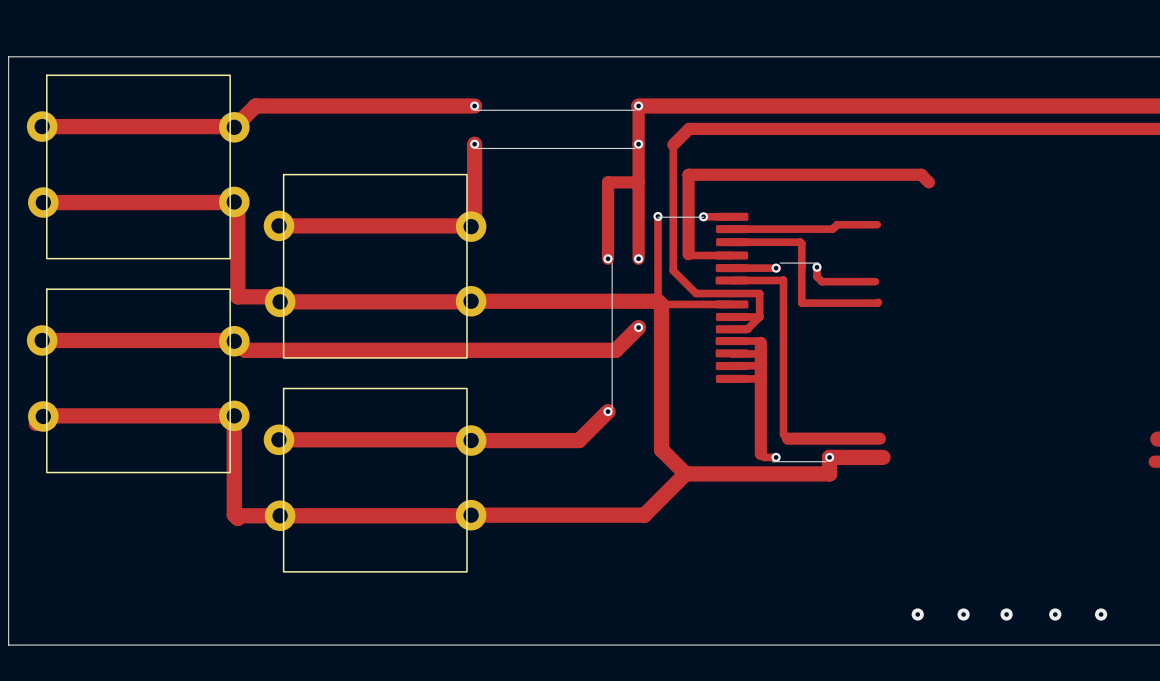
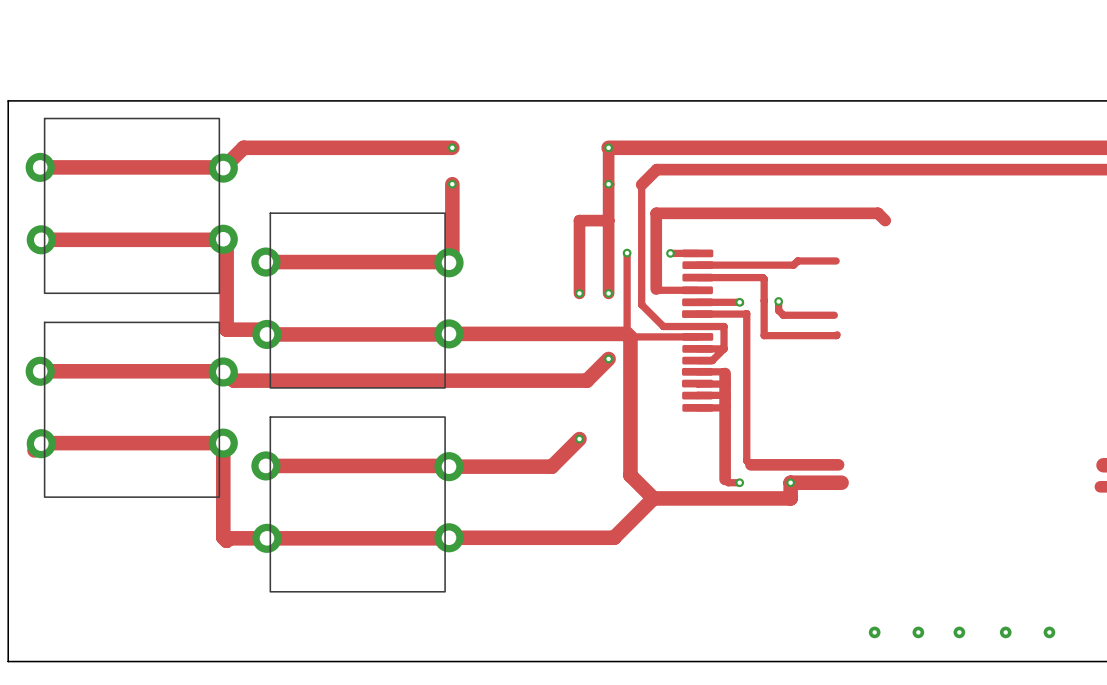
board edge: (474, 110) (635, 110) -> none
board edge: (474, 148) (635, 148) -> none
board edge: (658, 217) (703, 217) -> none
board edge: (612, 263) (612, 408) -> none
board edge: (780, 263) (818, 263) -> none
board edge: (772, 461) (826, 461) -> none

